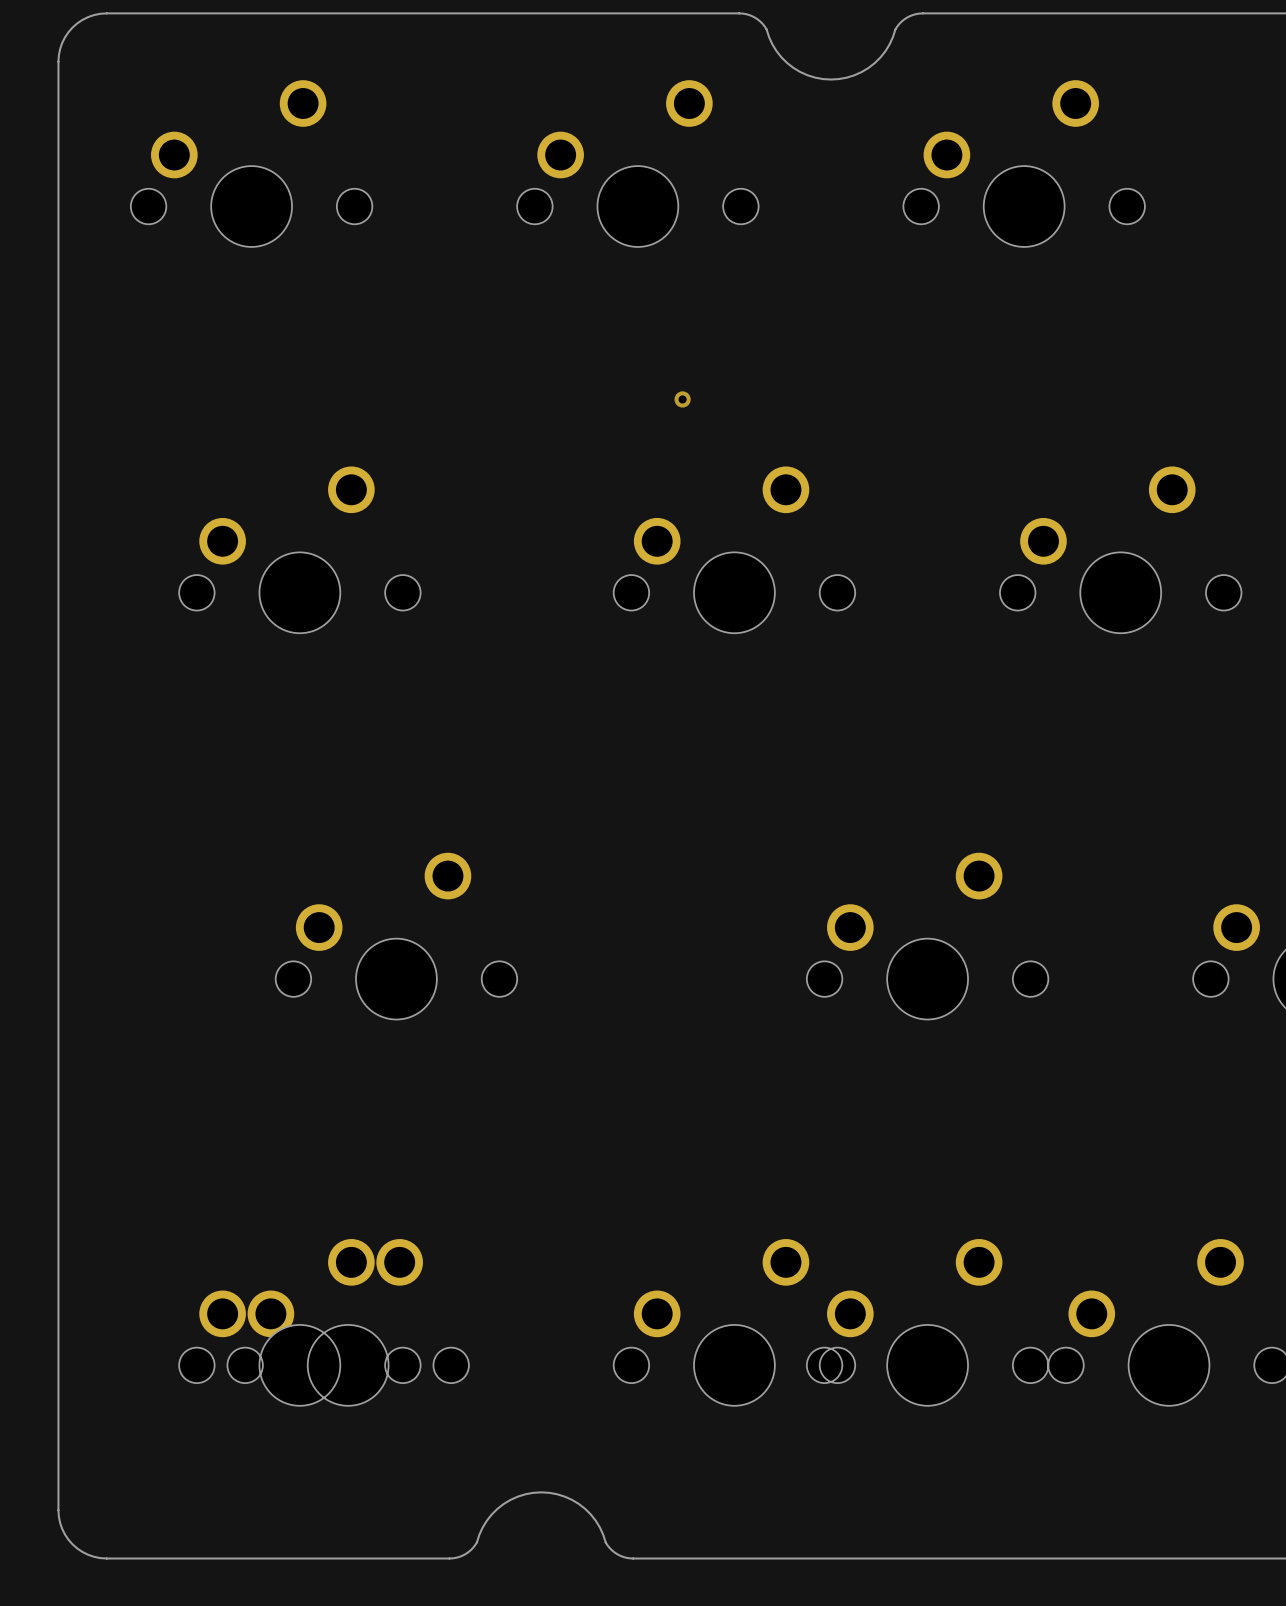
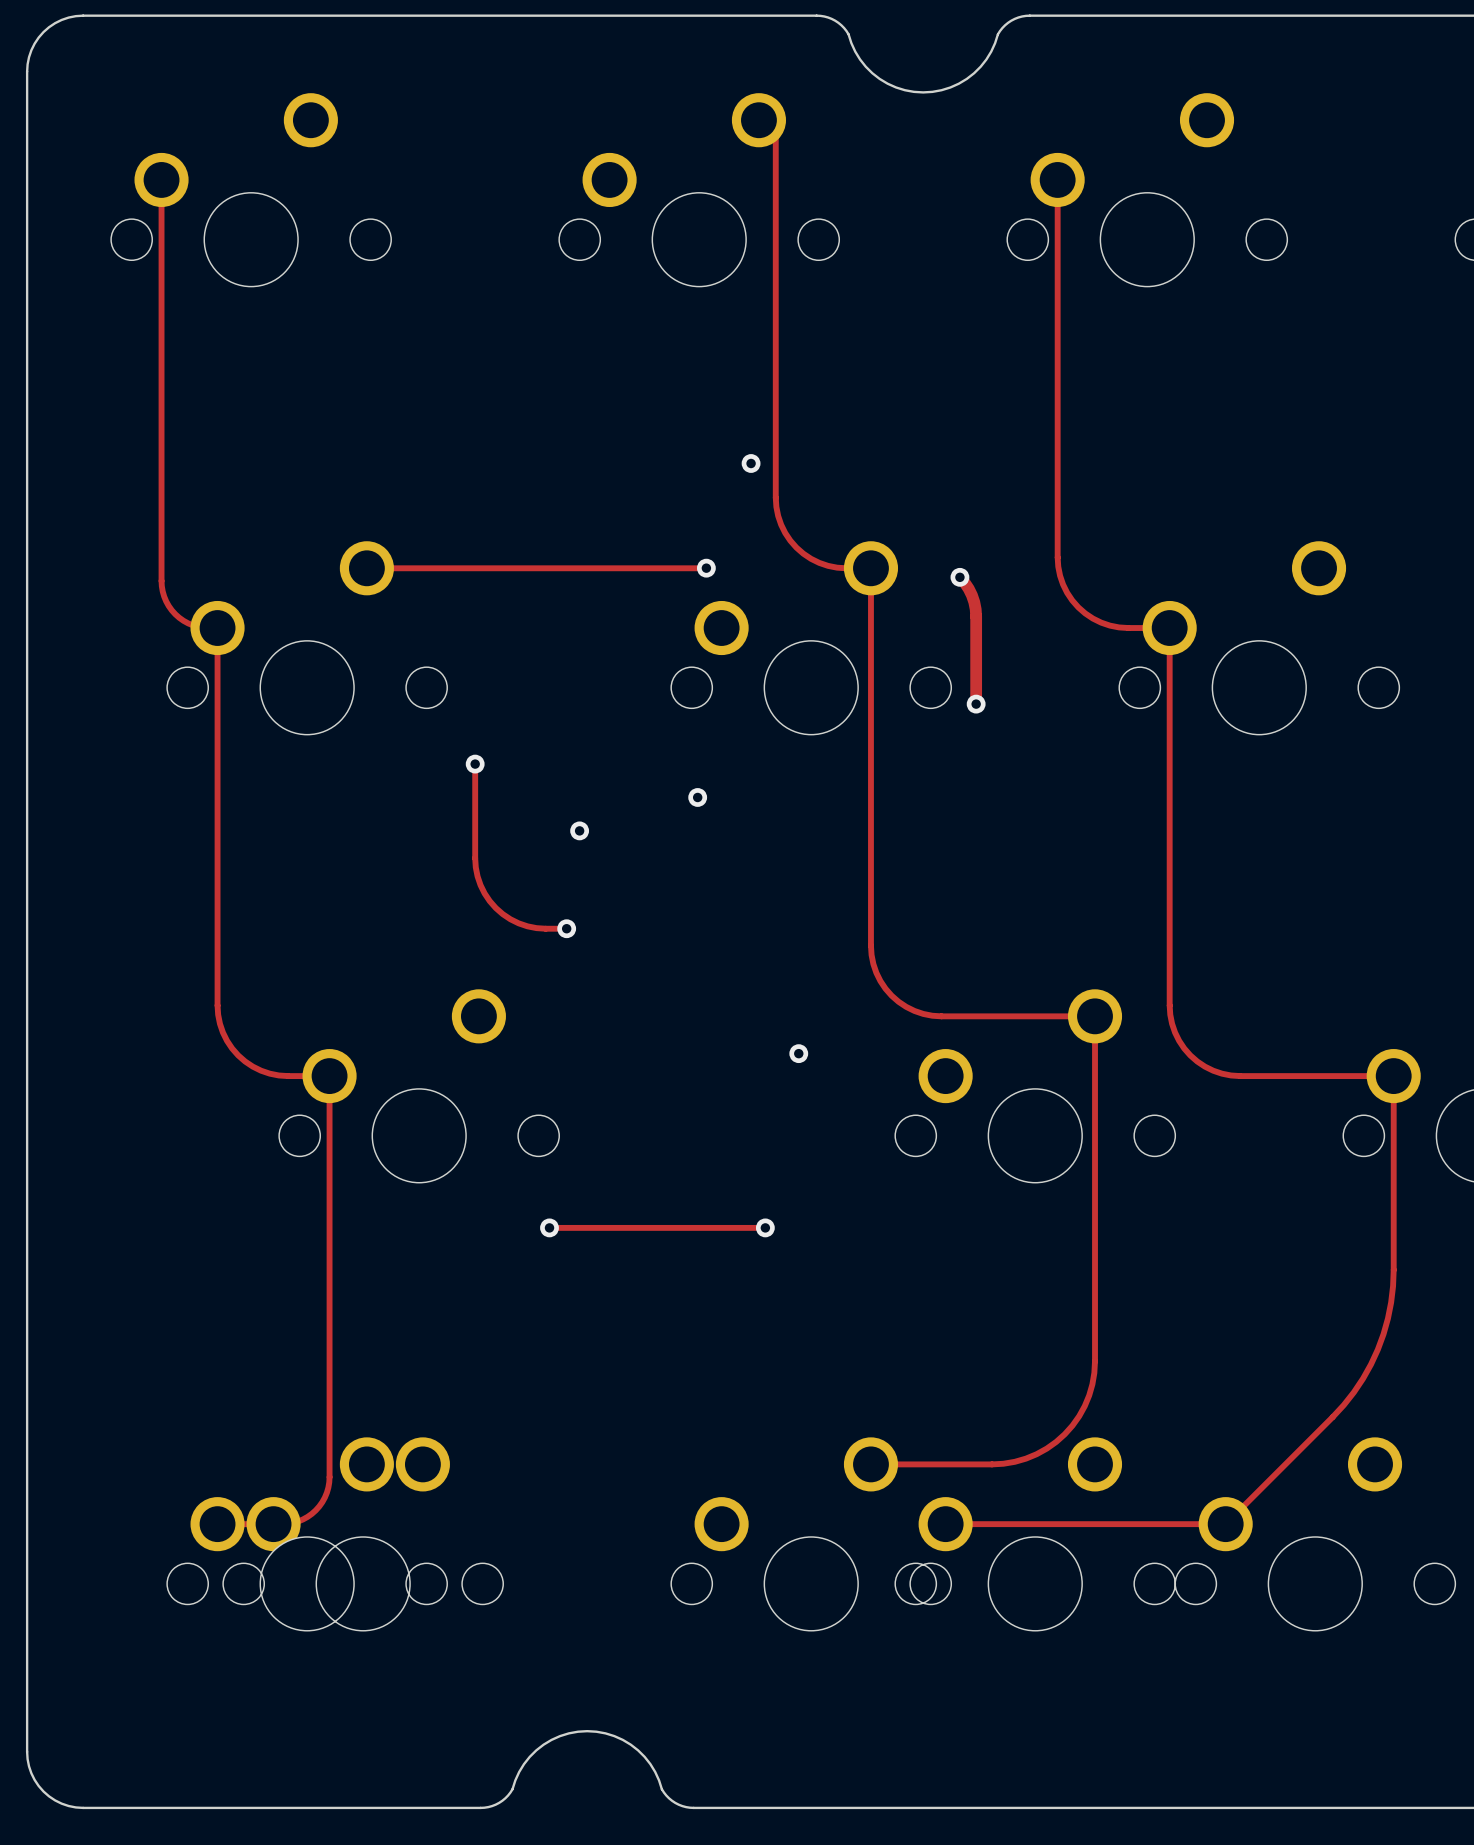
track: none -> (758, 120) (775, 137) (776, 506) (781, 524) (796, 547) (819, 562) (846, 568)
track: none -> (161, 179) (161, 586) (168, 606) (179, 617) (198, 626) (217, 628) (218, 1014) (222, 1032) (232, 1048) (252, 1066) (278, 1075) (329, 1076) (328, 1487) (324, 1497) (315, 1510) (298, 1521) (282, 1524) (217, 1524)
track: none -> (1057, 179) (1058, 566) (1067, 592) (1078, 607) (1092, 618) (1119, 627) (1169, 628) (1169, 1005) (1172, 1023) (1179, 1040) (1190, 1055) (1204, 1066) (1221, 1073) (1240, 1076) (1393, 1076) (1393, 1286) (1387, 1318) (1377, 1349) (1353, 1392) (1332, 1417) (1225, 1524) (945, 1524)
track: none -> (366, 568) (706, 568)
via: none -> (706, 568)
track: none -> (870, 568) (870, 945) (873, 964) (880, 981) (898, 1001) (914, 1010) (932, 1015) (1095, 1016) (1095, 1361) (1092, 1384) (1084, 1406) (1072, 1425) (1056, 1441) (1036, 1454) (1014, 1461) (991, 1464) (870, 1464)
track: none -> (959, 577) (971, 595) (975, 609) (976, 704)
via: none -> (959, 577)
via: none -> (976, 704)
track: none -> (475, 764) (475, 867) (484, 893) (502, 914) (518, 923) (536, 928) (566, 928)
via: none -> (475, 764)
via: none -> (697, 797)
via: none -> (579, 830)
via: none -> (566, 928)
via: none -> (798, 1053)
track: none -> (549, 1227) (765, 1227)
via: none -> (549, 1227)
via: none -> (765, 1227)

